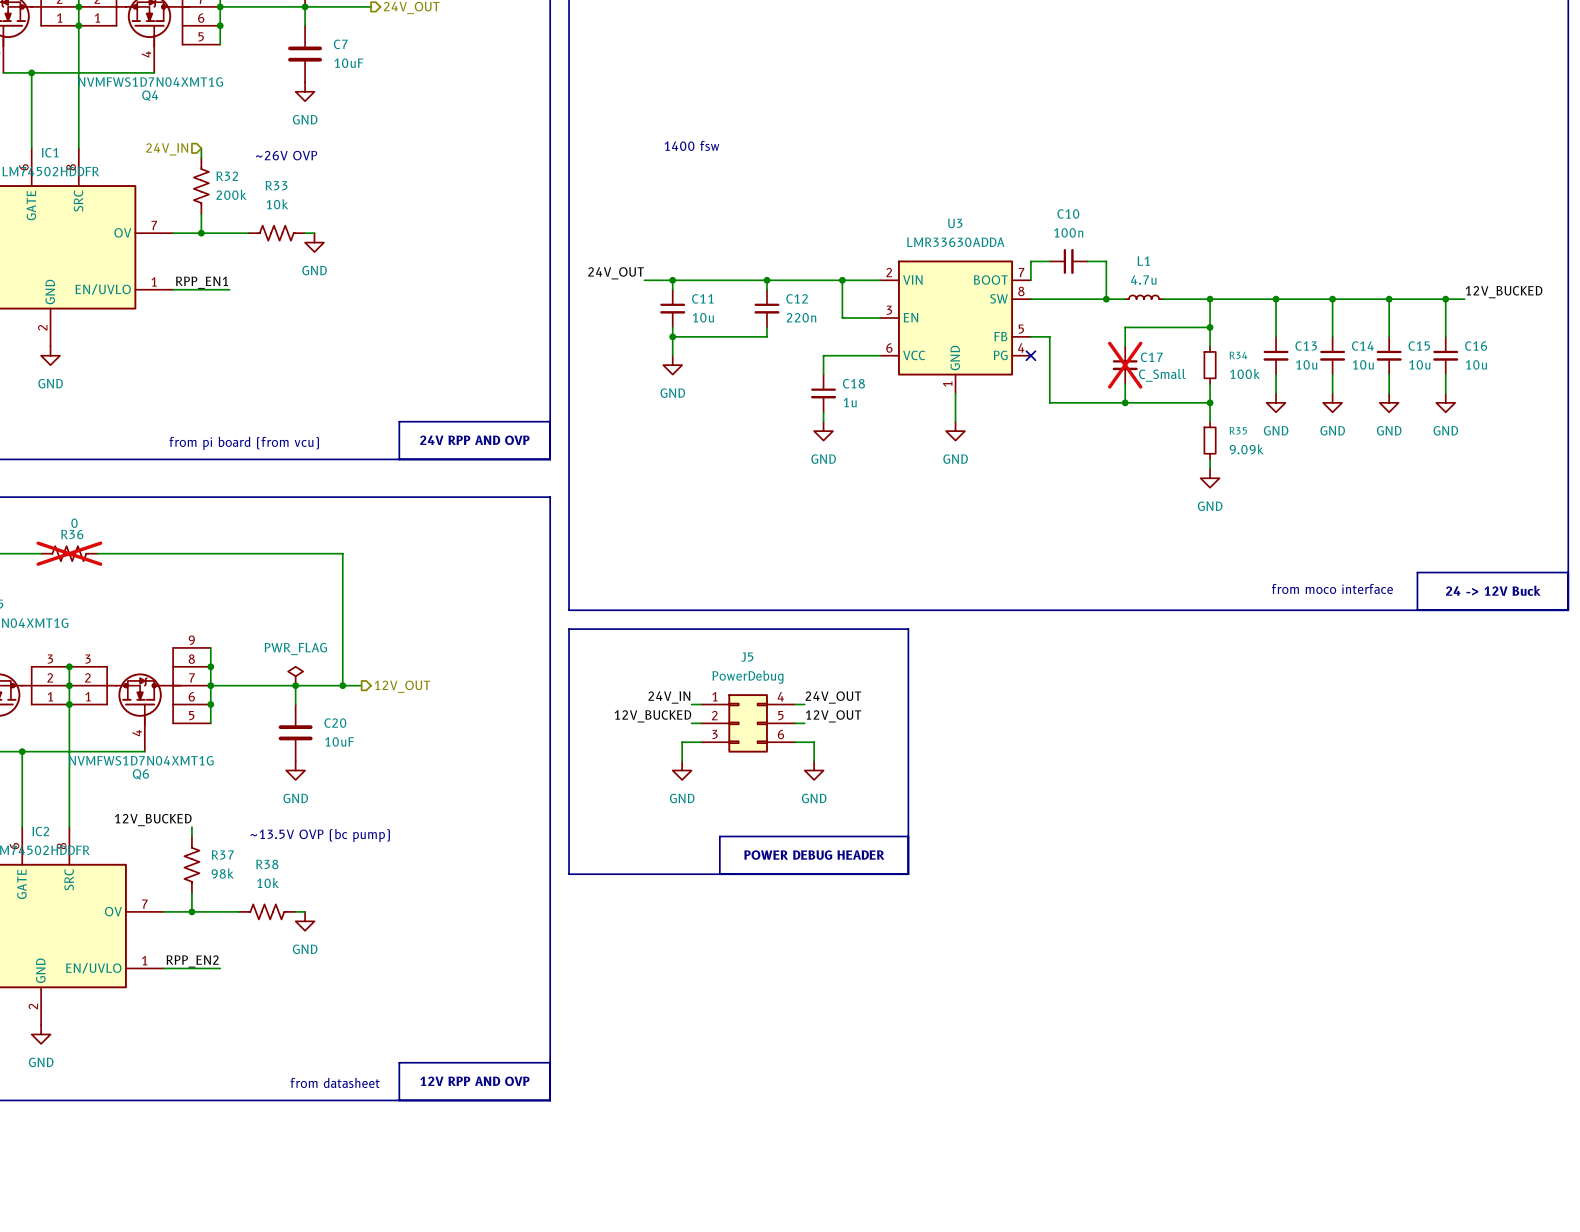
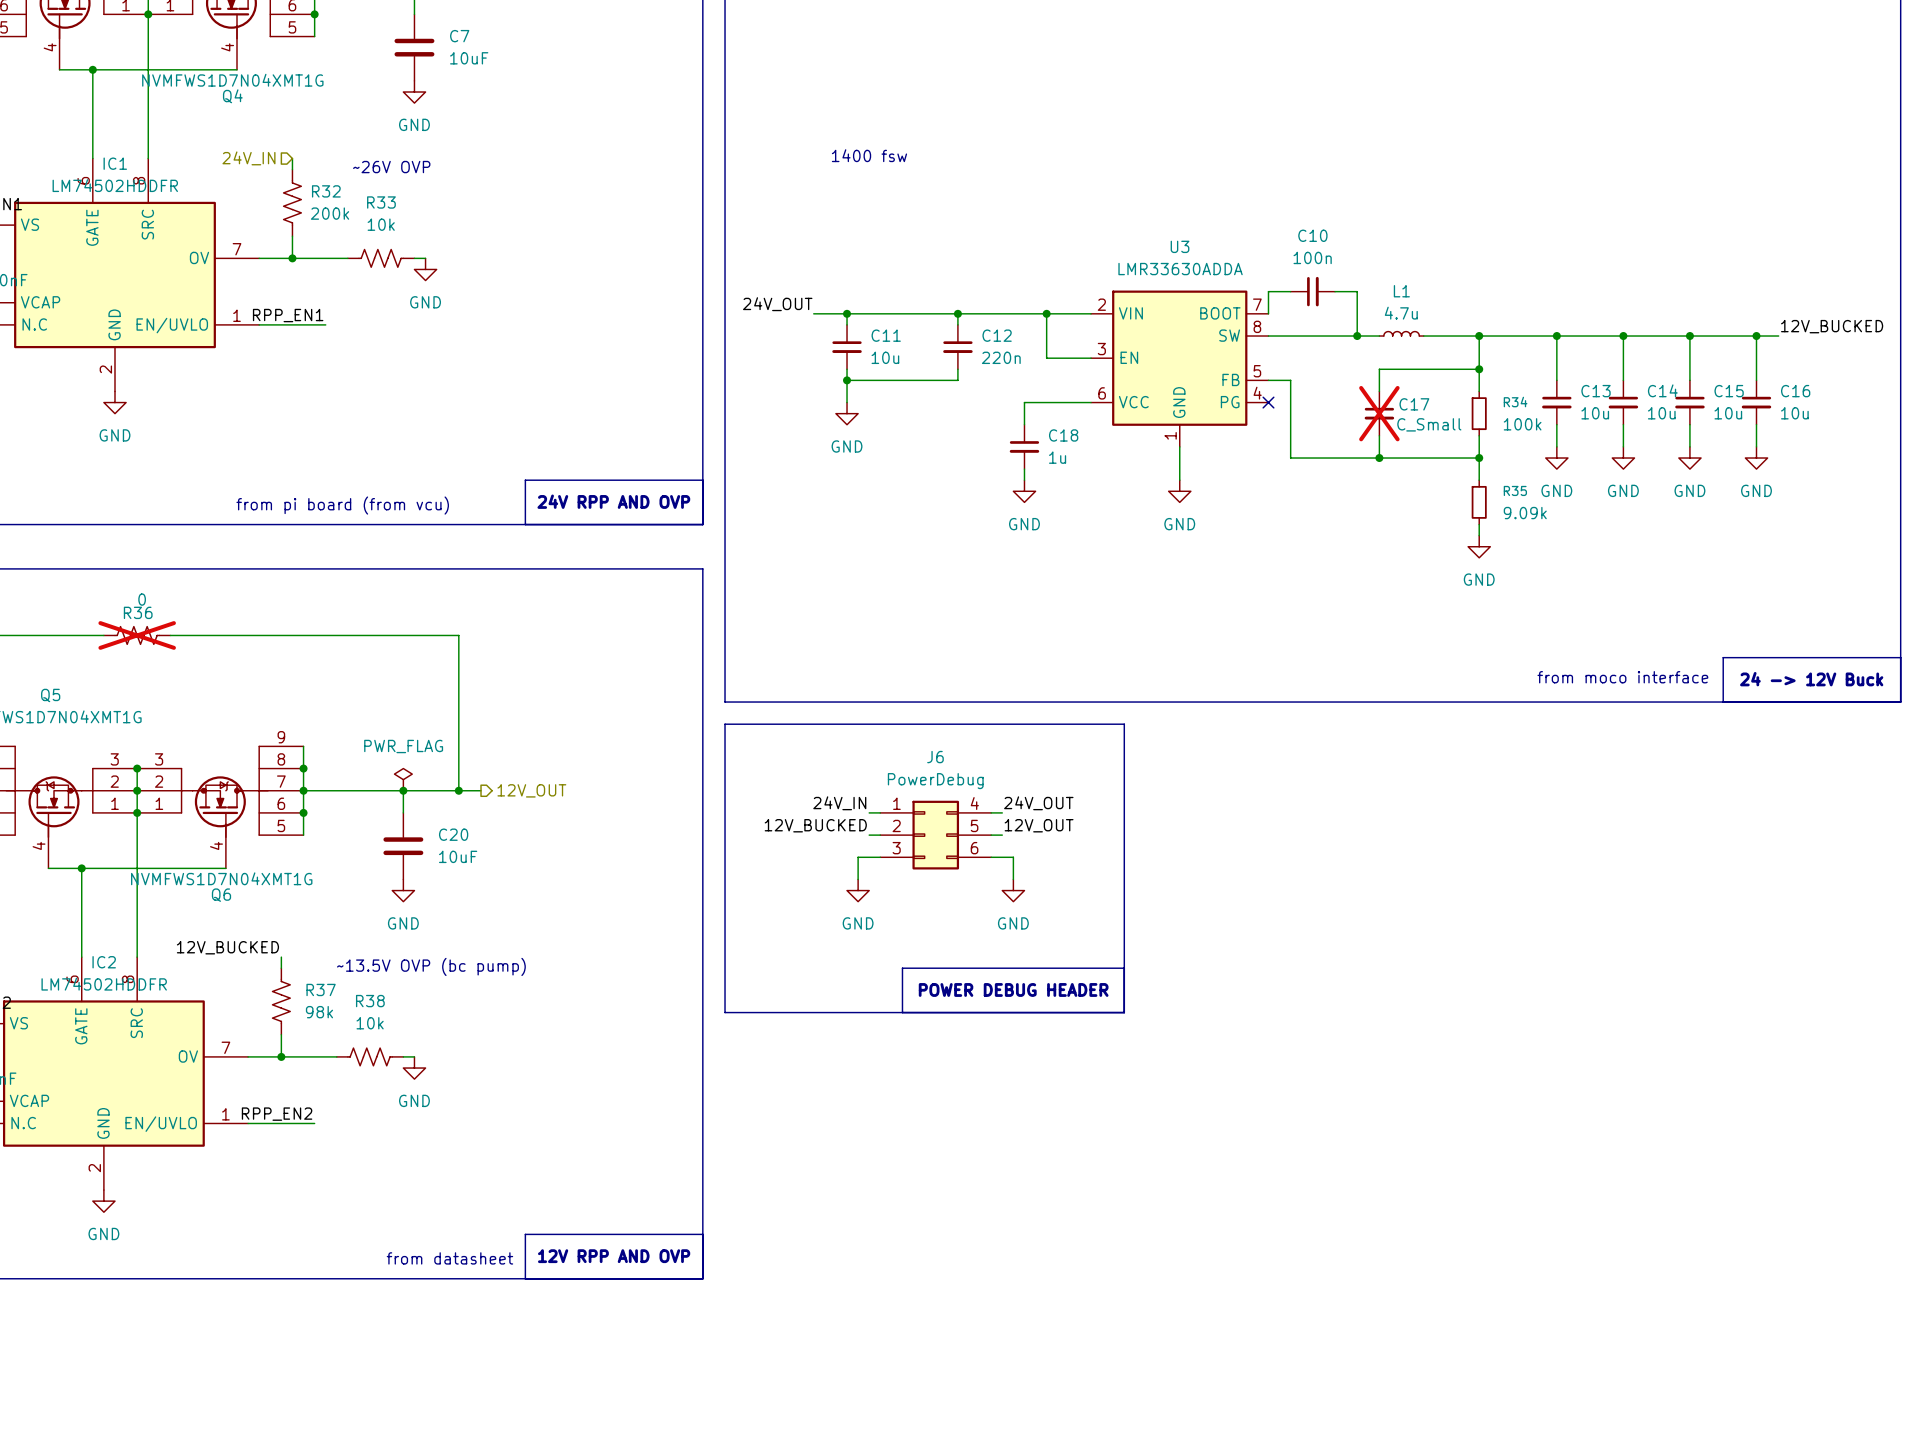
J5 name: J5 (747, 657) -> J6 (935, 757)

